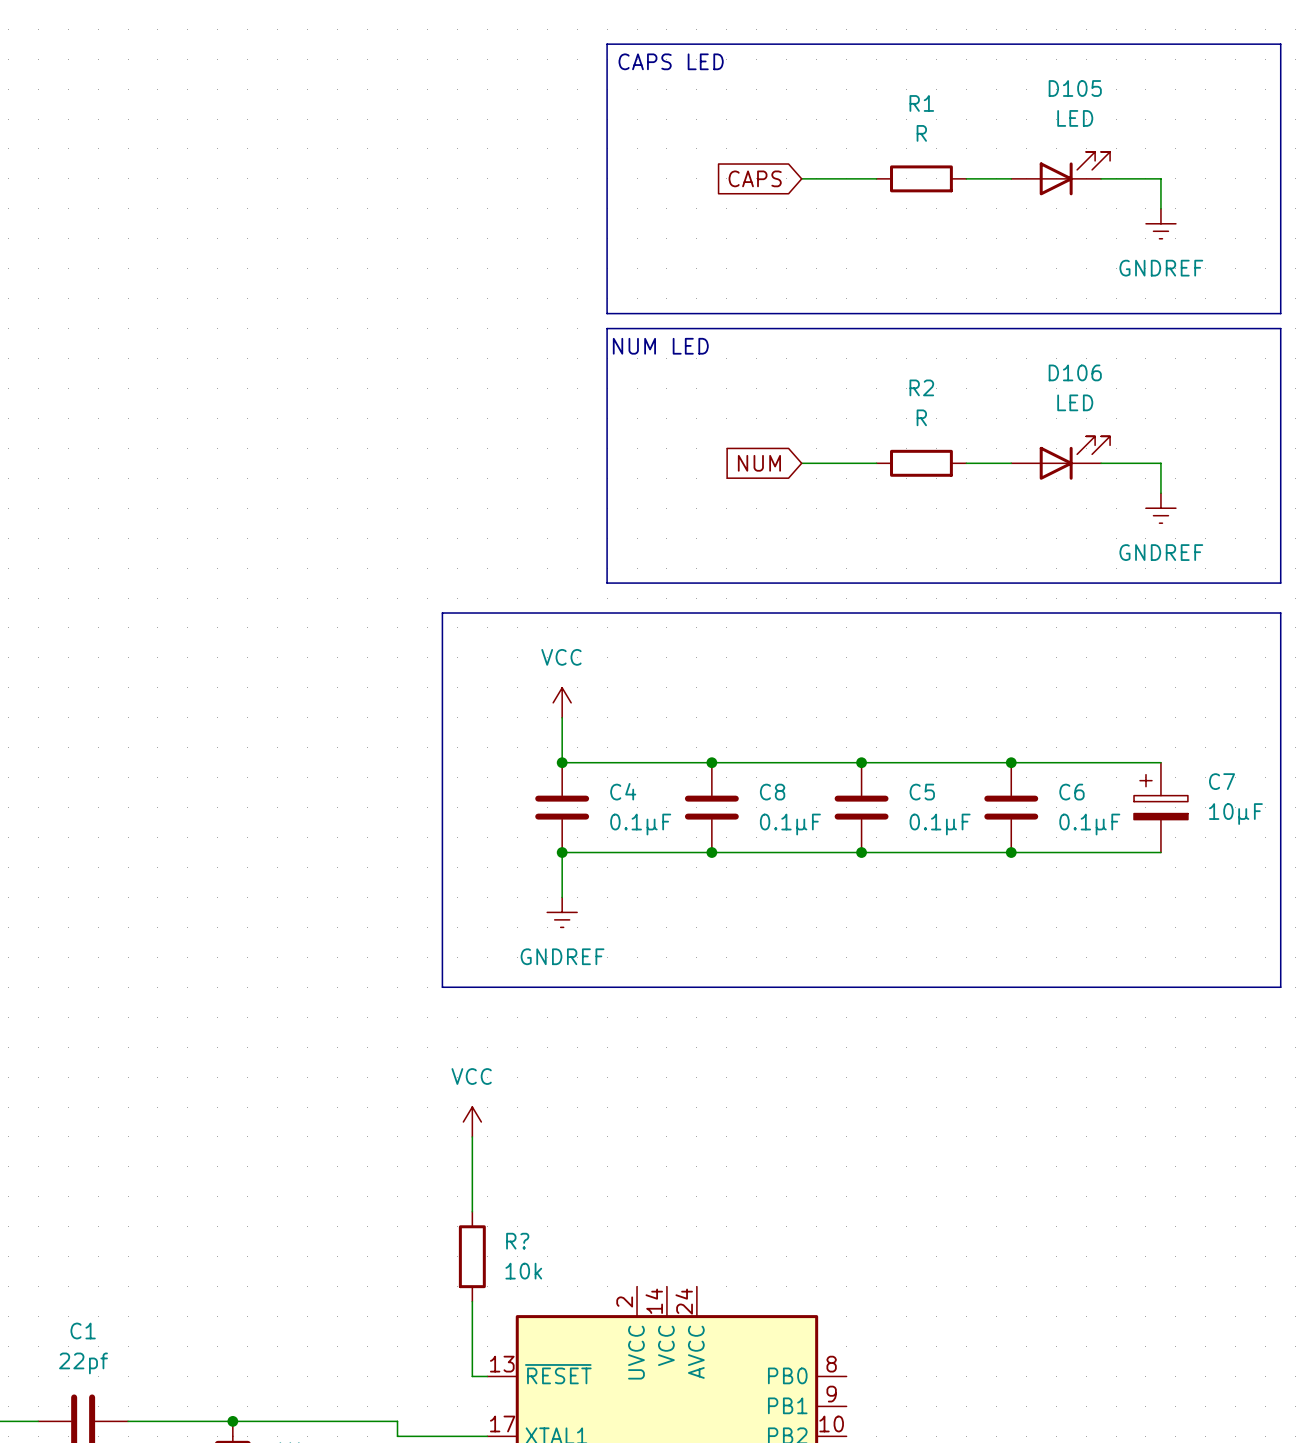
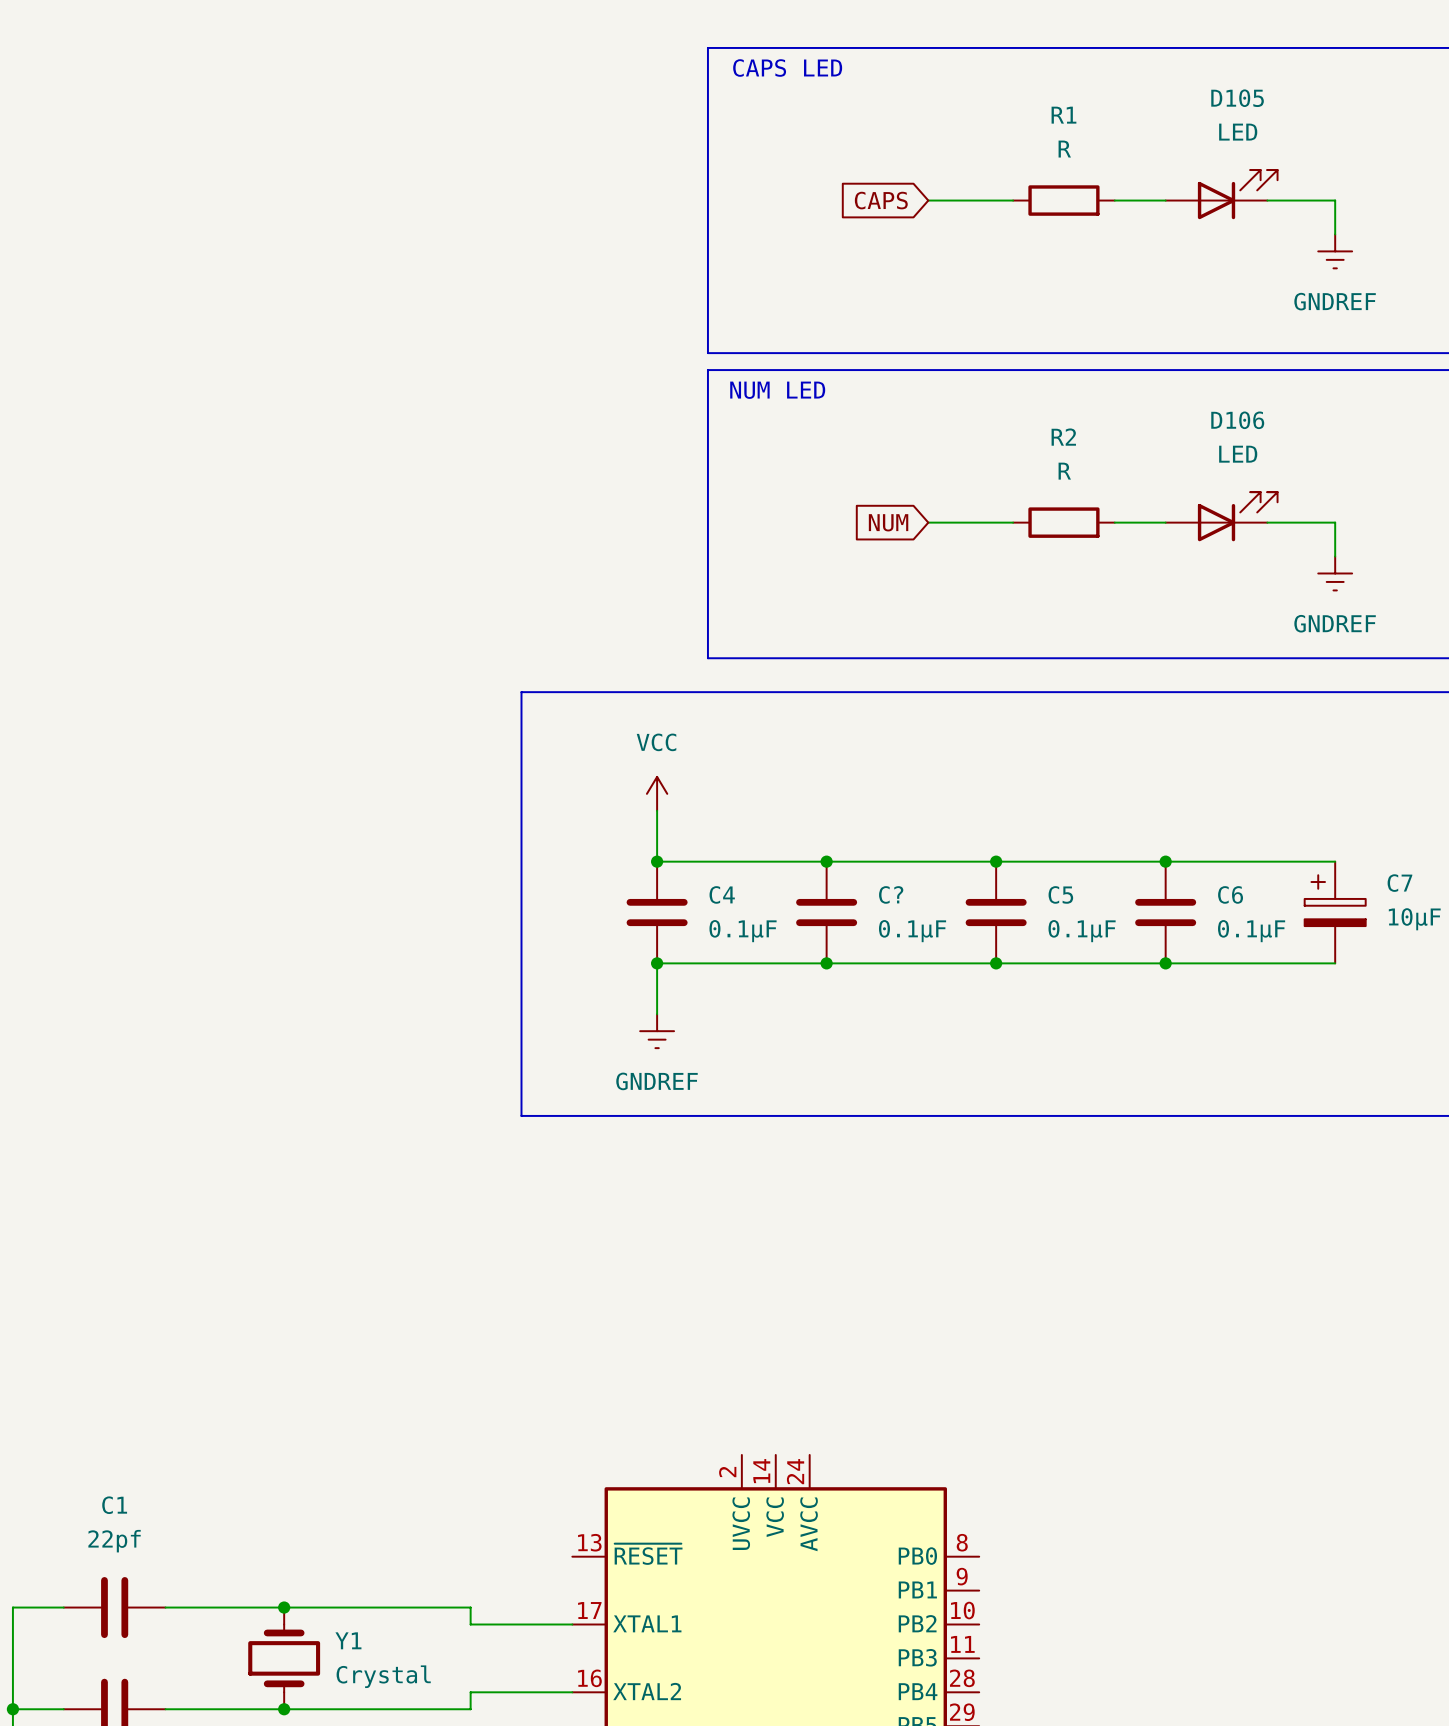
C8 name: C8 (772, 792) -> C? (891, 894)
power symbol: VCC (472, 1121) -> none
wire: (472, 1136) (472, 1211) -> none
R?: 10k (472, 1256) -> none
wire: (472, 1301) (472, 1376) (487, 1376) -> none

